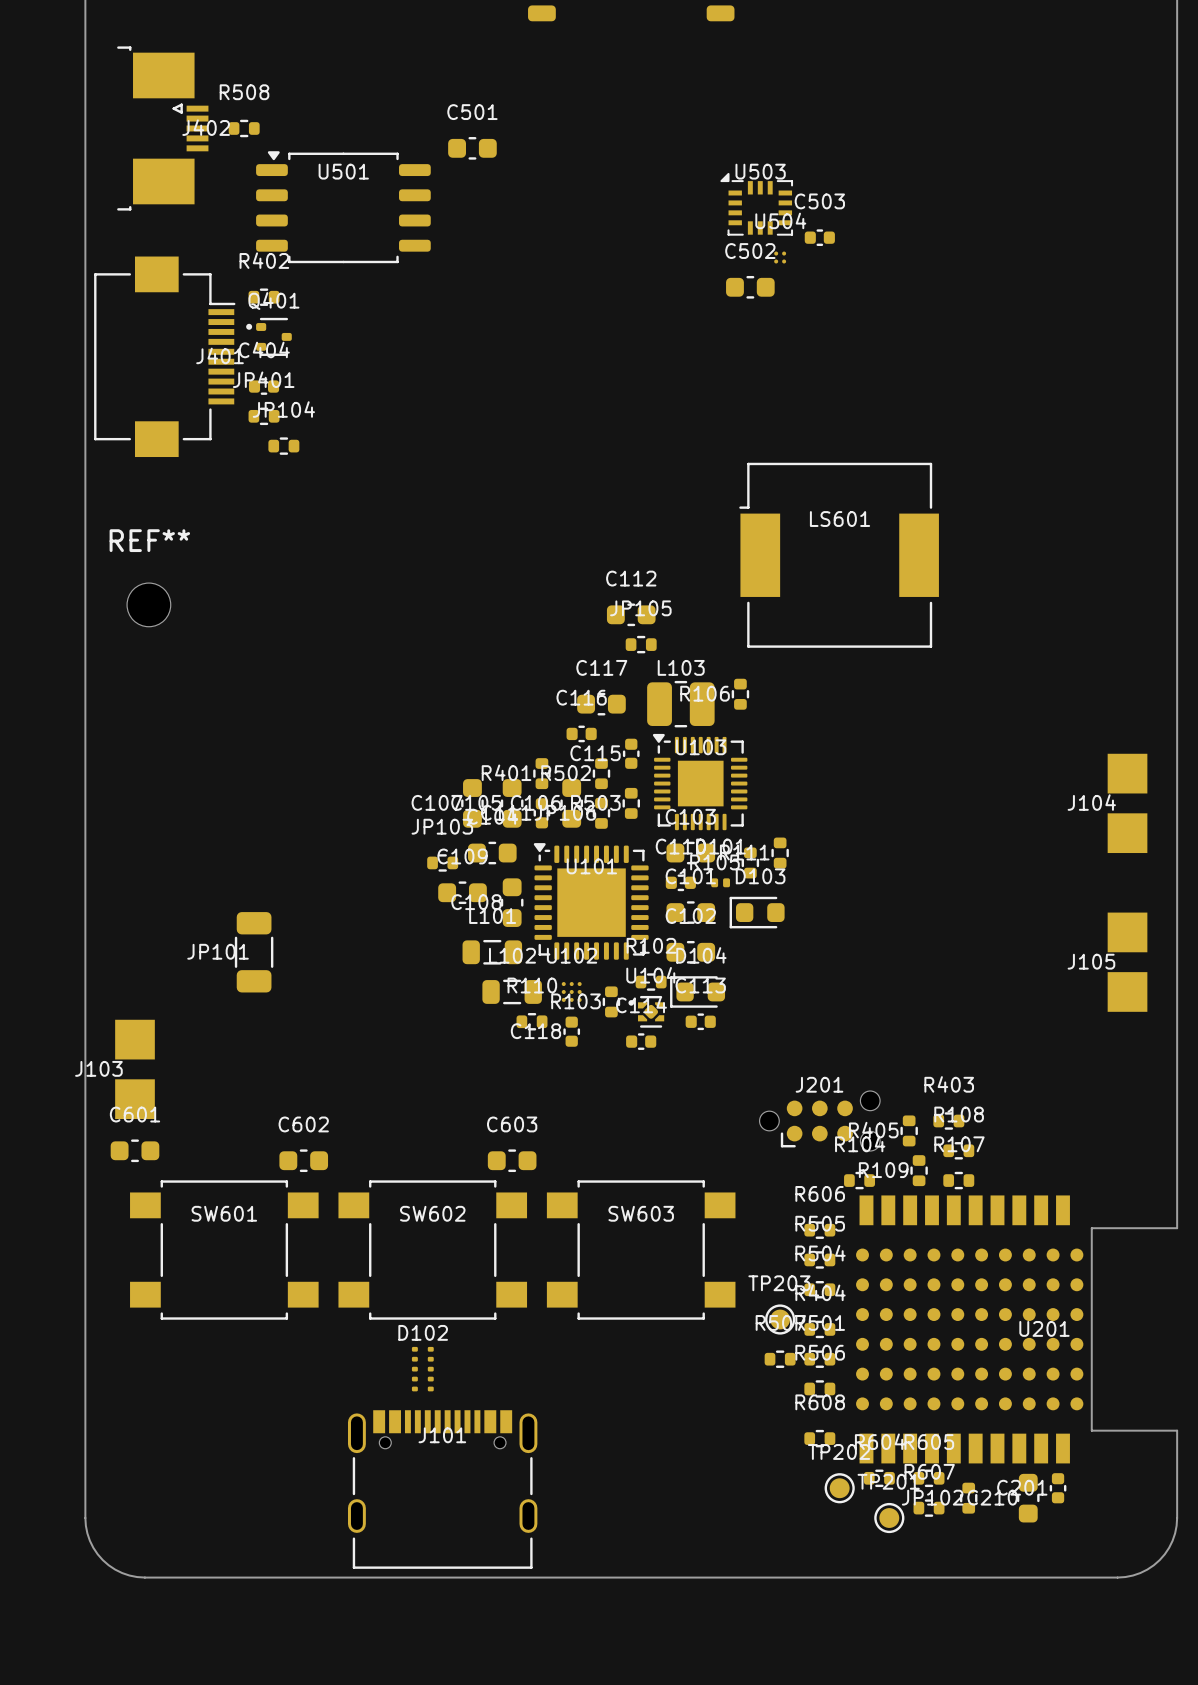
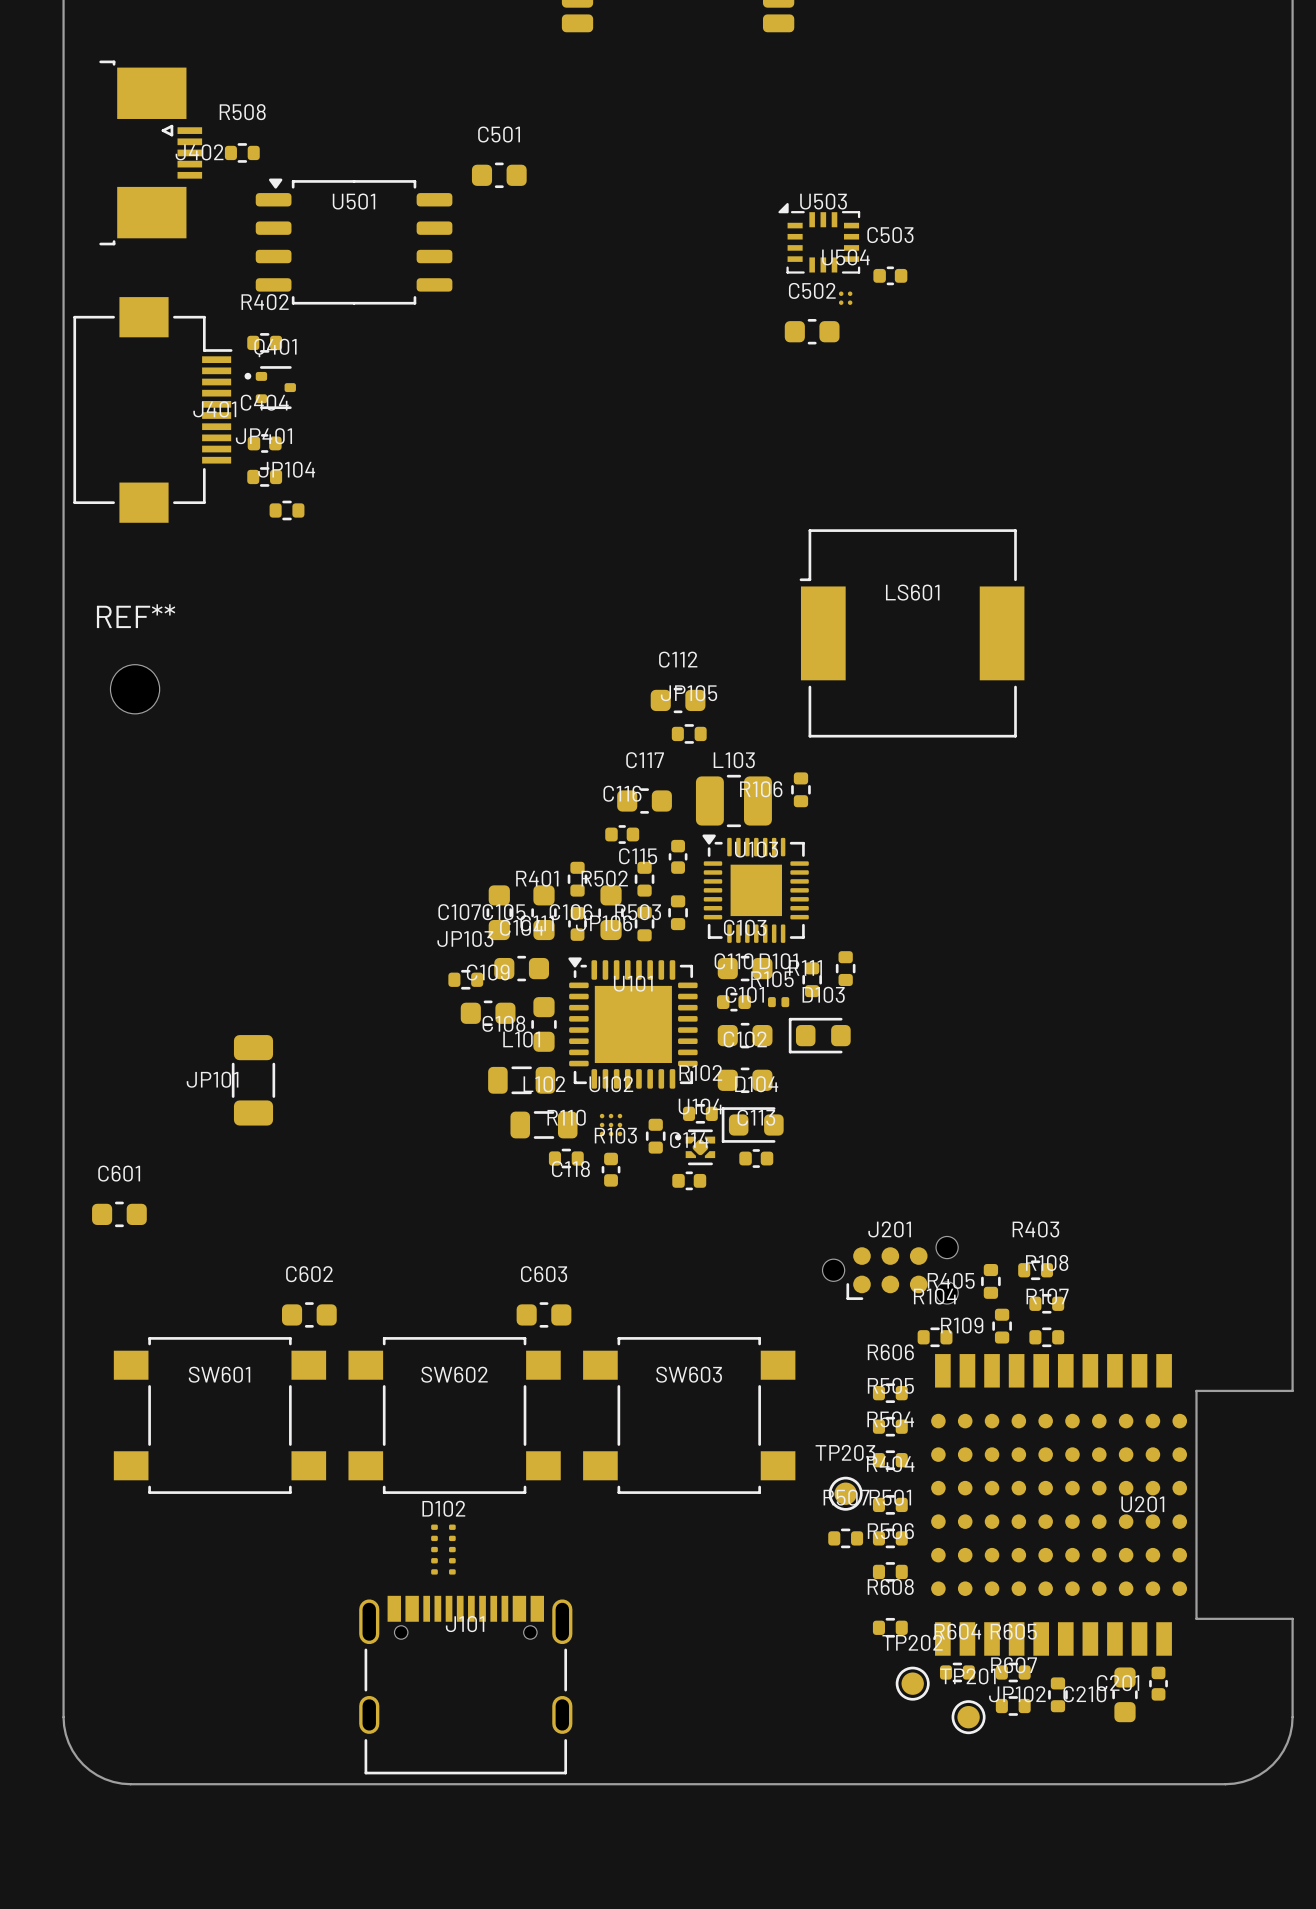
J104: (1127, 803) -> none
J105: (1127, 962) -> none
J103: (134, 1069) -> none
C601 position: (134, 1150) -> (119, 1214)

